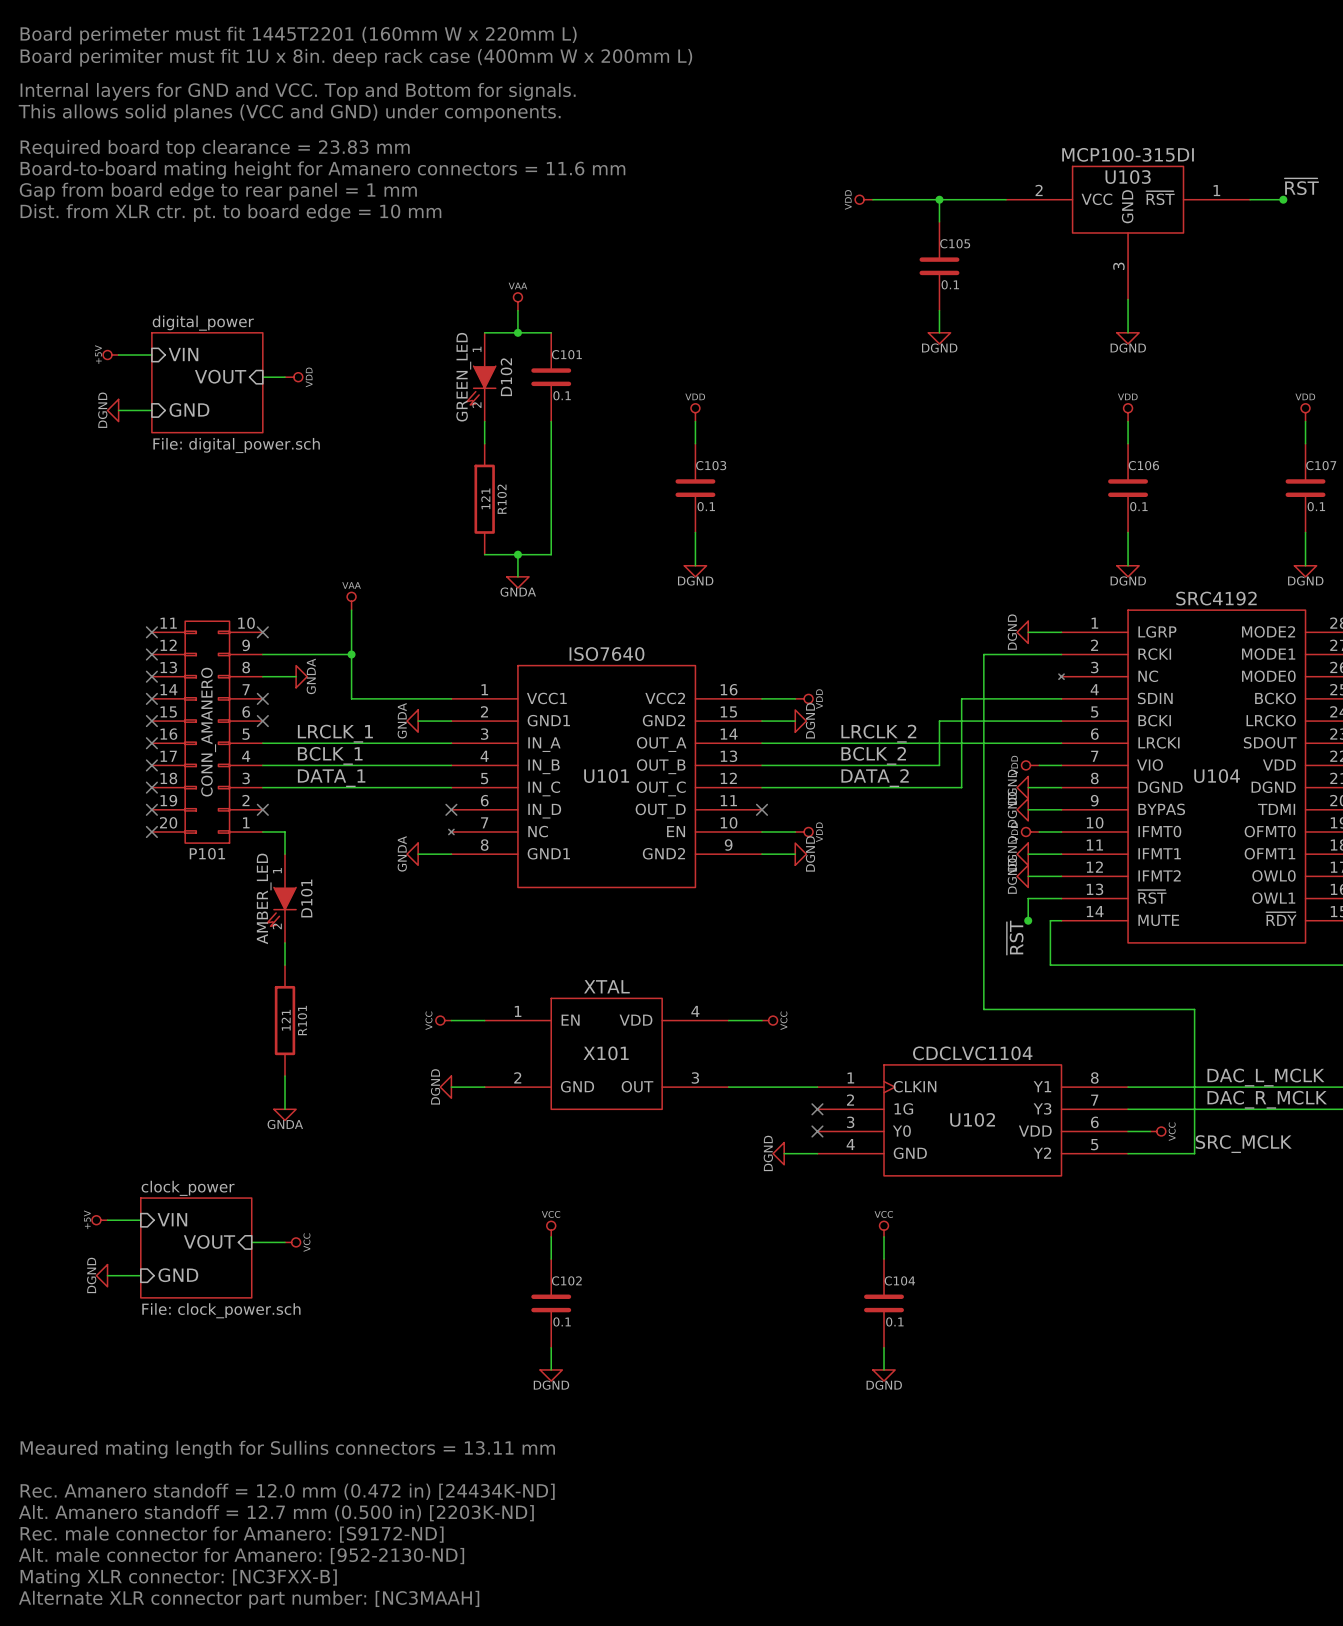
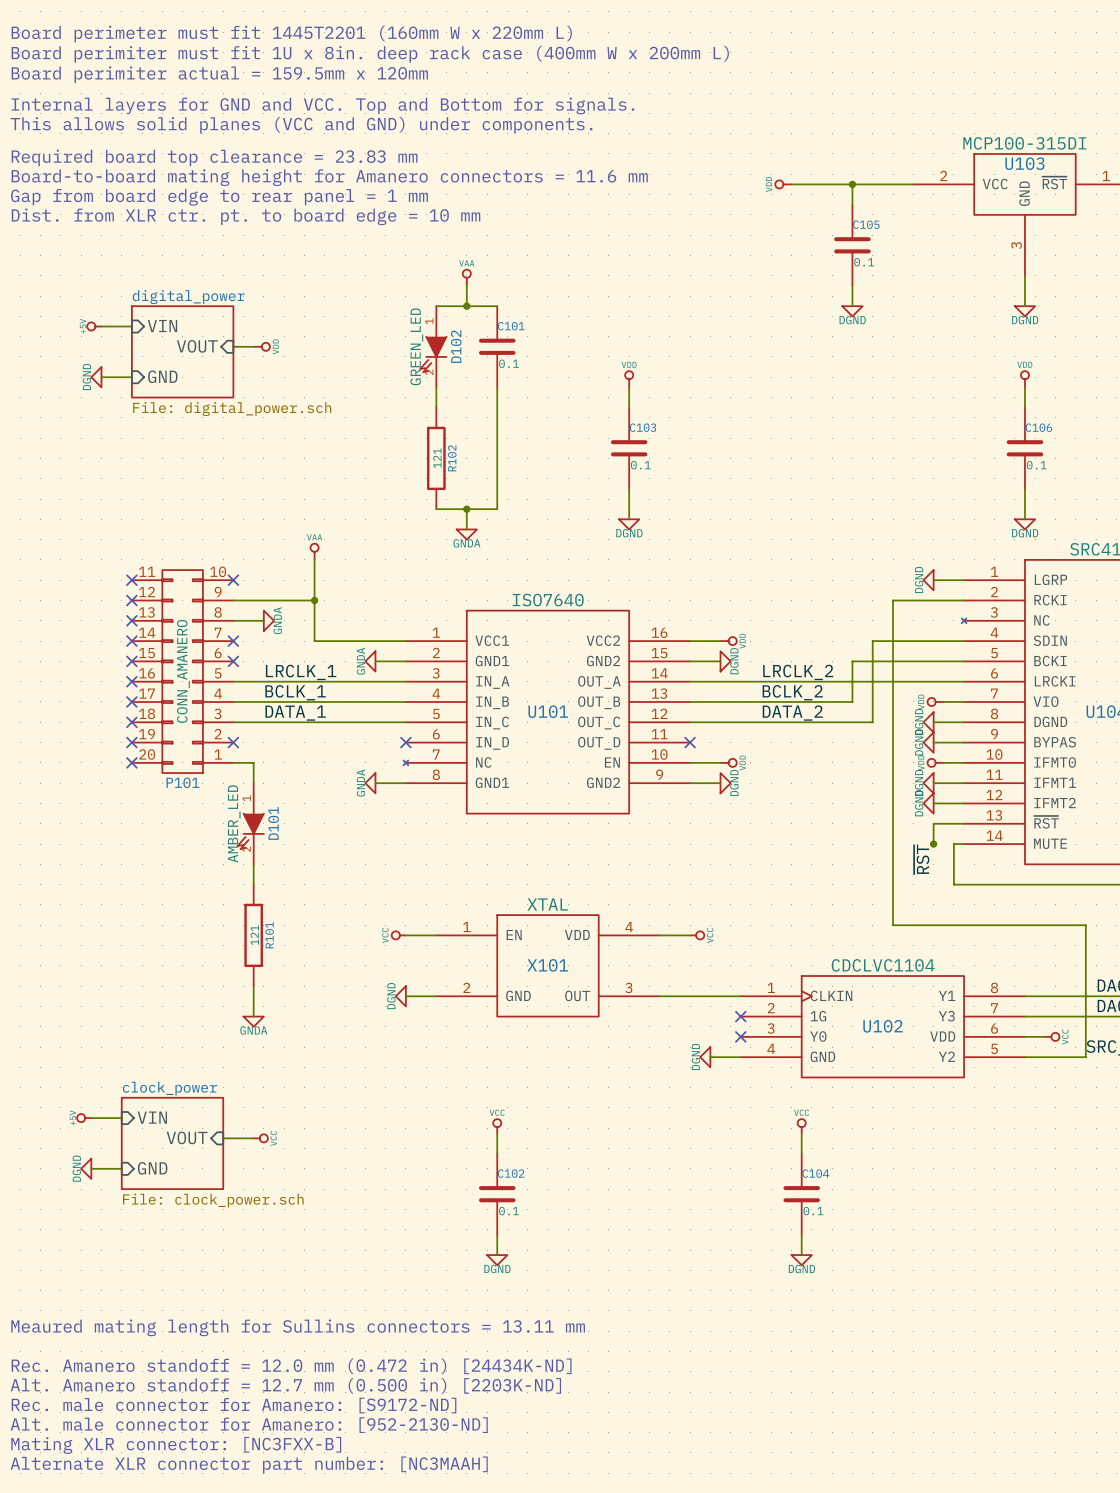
text: none -> Board perimiter actual = 159.5mm x 120mm (219, 74)
text: Internal layers for GND and VCC. Top and Bottom for signals. (298, 91) -> none
text: This allows solid planes (VCC and GND) under components. (289, 113) -> Internal layers for GND and VCC. Top and Bottom for signals. (322, 105)
text: none -> This allows solid planes (VCC and GND) under components. (301, 125)
text: Required board top clearance = 23.83 mm (215, 148) -> none
text: Board-to-board mating height for Amanero connectors = 11.6 mm (322, 170) -> Required board top clearance = 23.83 mm (214, 157)
text: Gap from board edge to rear panel = 1 mm (218, 191) -> Board-to-board mating height for Amanero connectors = 11.6 mm (329, 177)
text: Dist. from XLR ctr. pt. to board edge = 10 mm (230, 213) -> Gap from board edge to rear panel = 1 mm (219, 197)
text: none -> Dist. from XLR ctr. pt. to board edge = 10 mm (246, 216)

